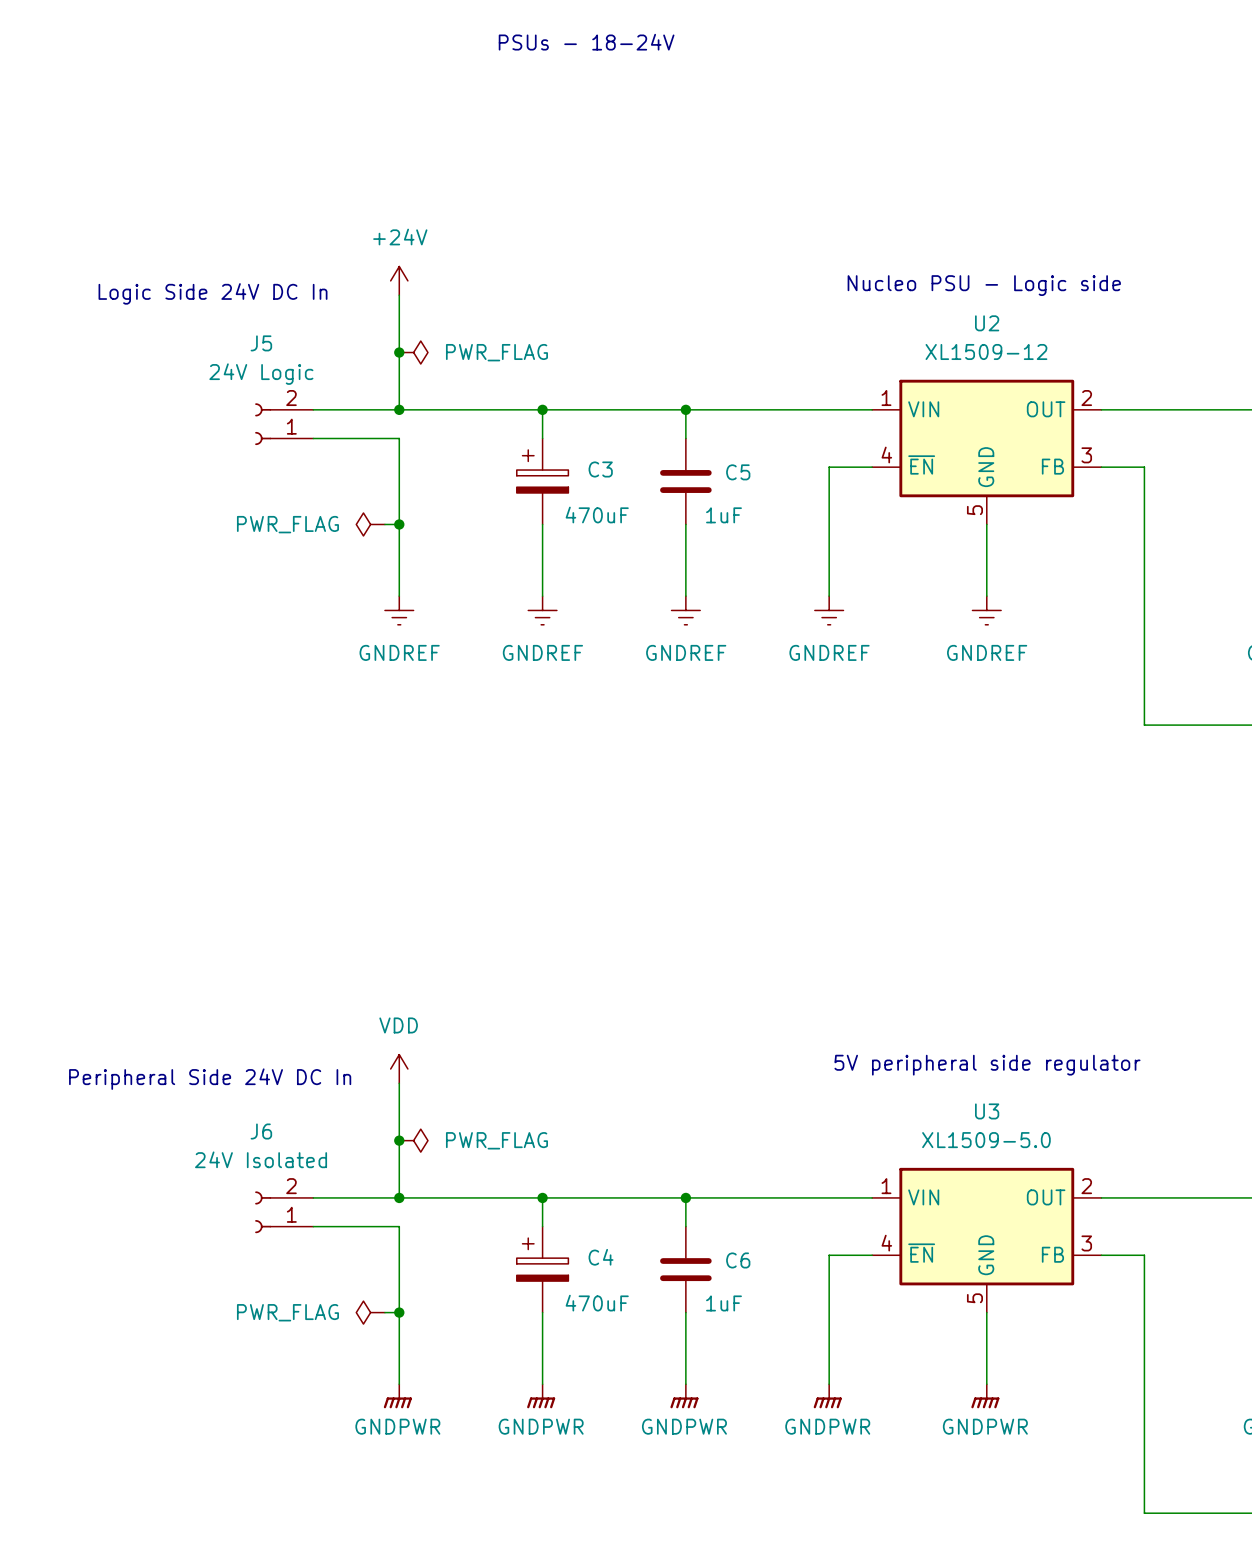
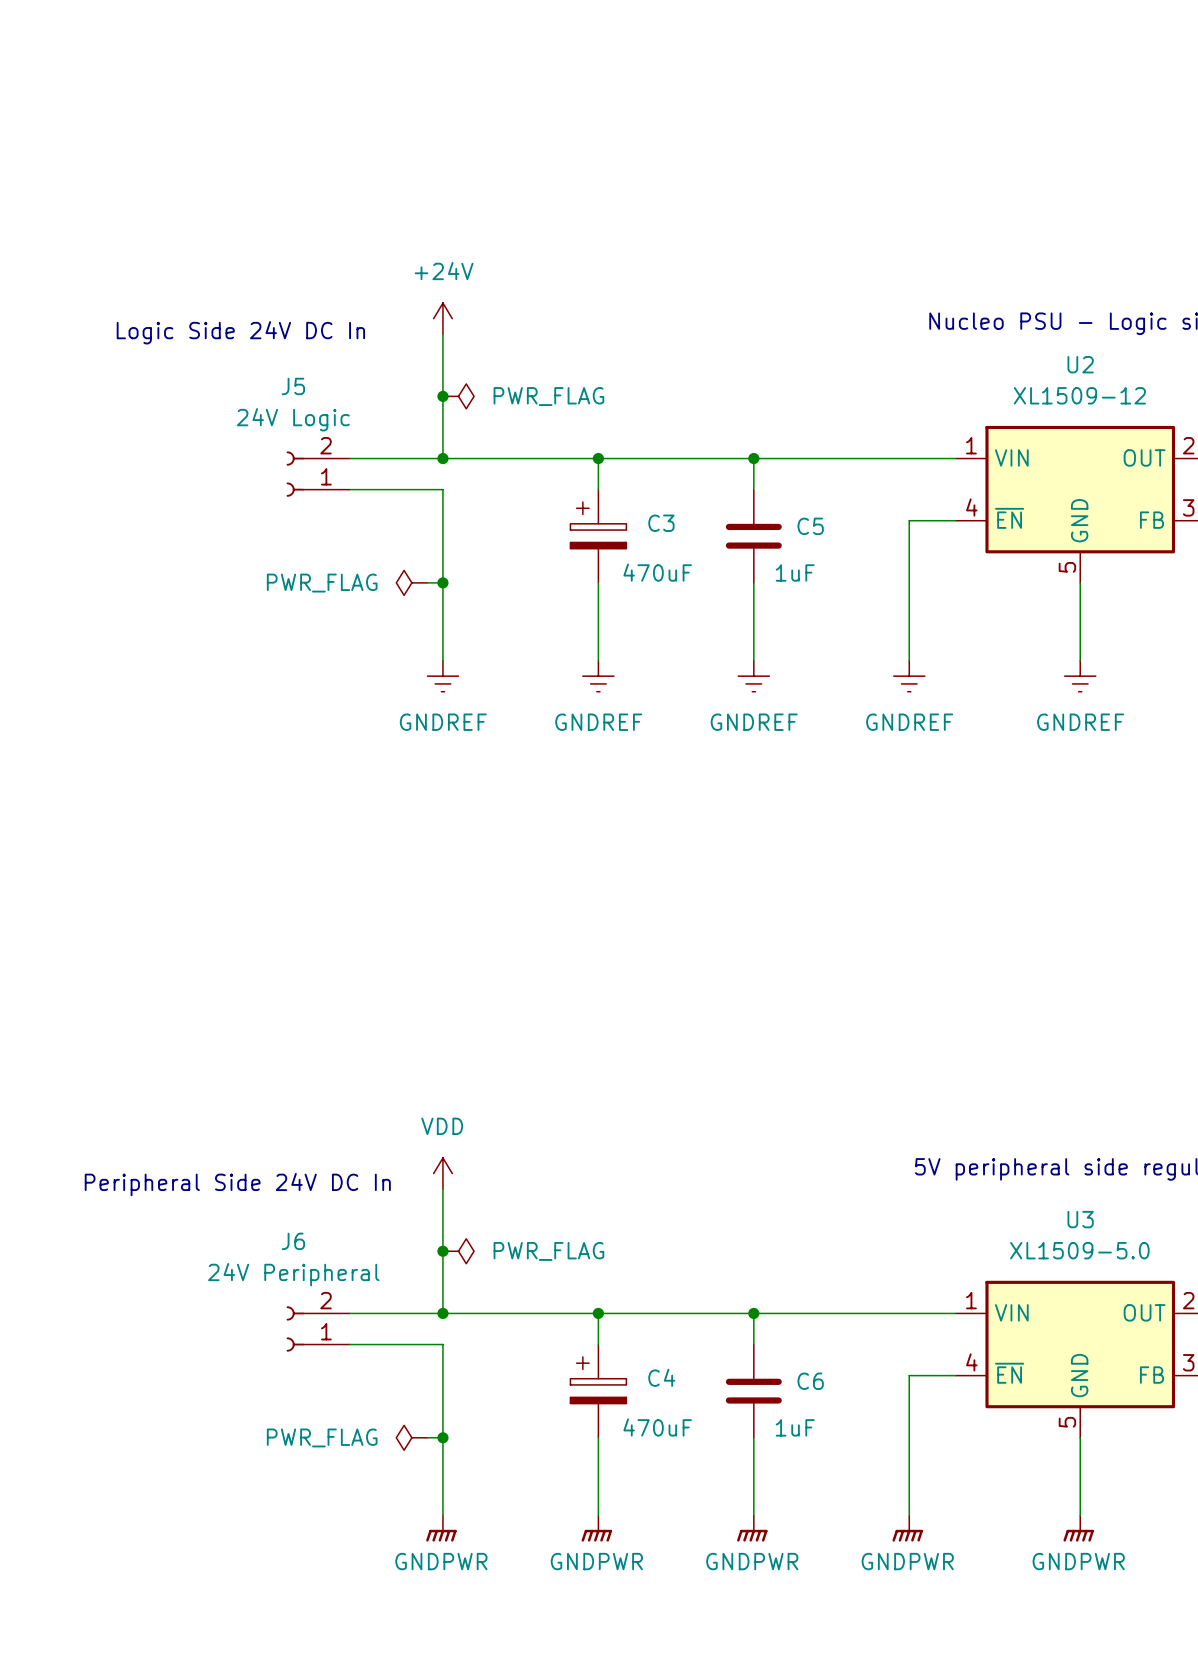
text: PSUs - 18-24V (586, 42) -> none
J6 value: 24V Isolated (261, 1159) -> 24V Peripheral (293, 1274)

